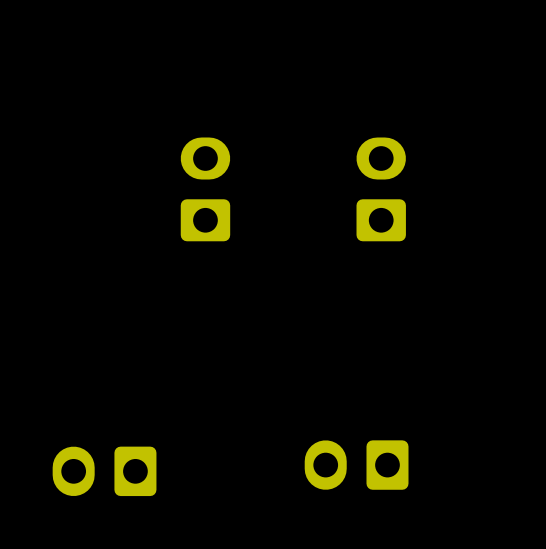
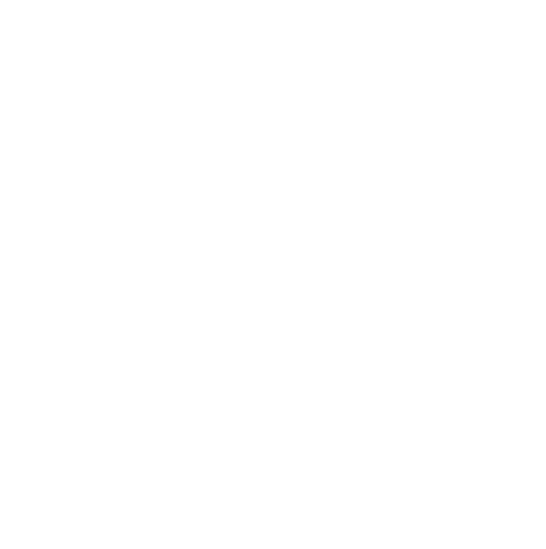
part: (205, 189) -> none
part: (381, 189) -> none
part: (356, 465) -> none
part: (104, 471) -> none

